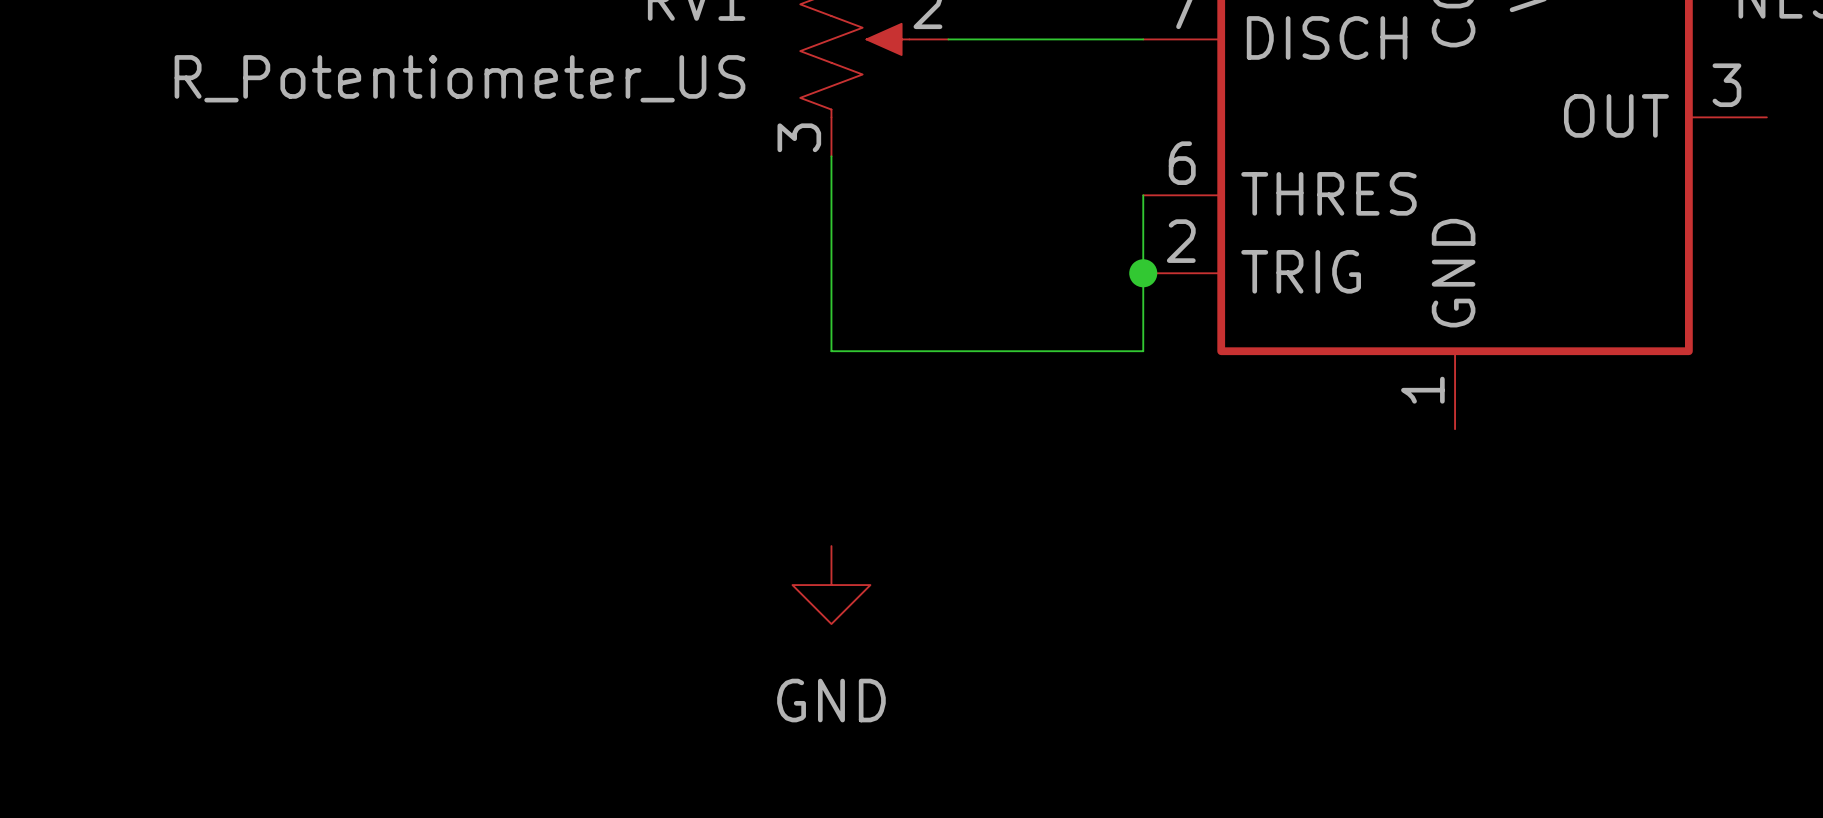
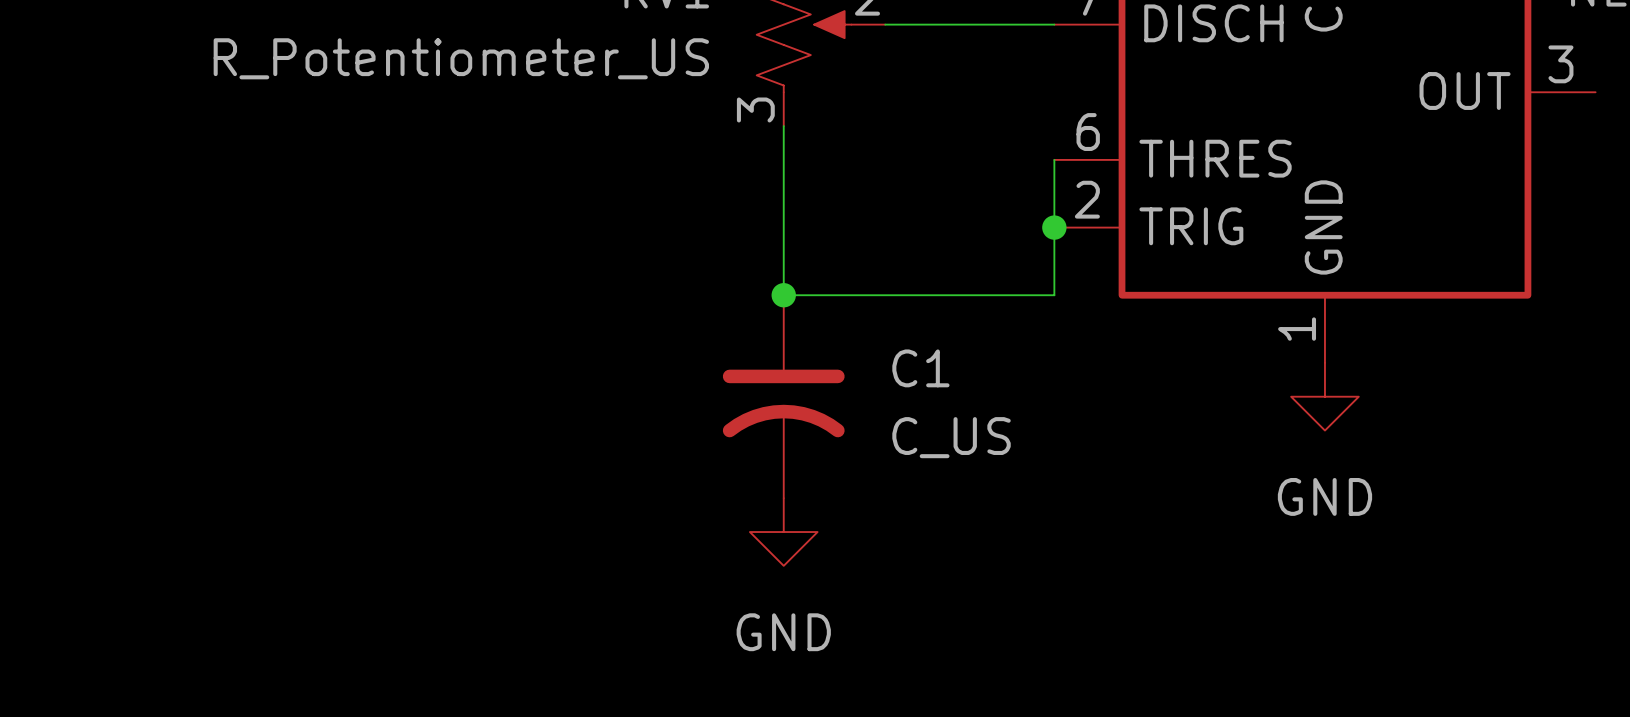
junction: none -> (783, 295)
C1: none -> C_US (783, 396)
power symbol: none -> GND (1324, 396)
power symbol position: GND (831, 585) -> GND (783, 532)

